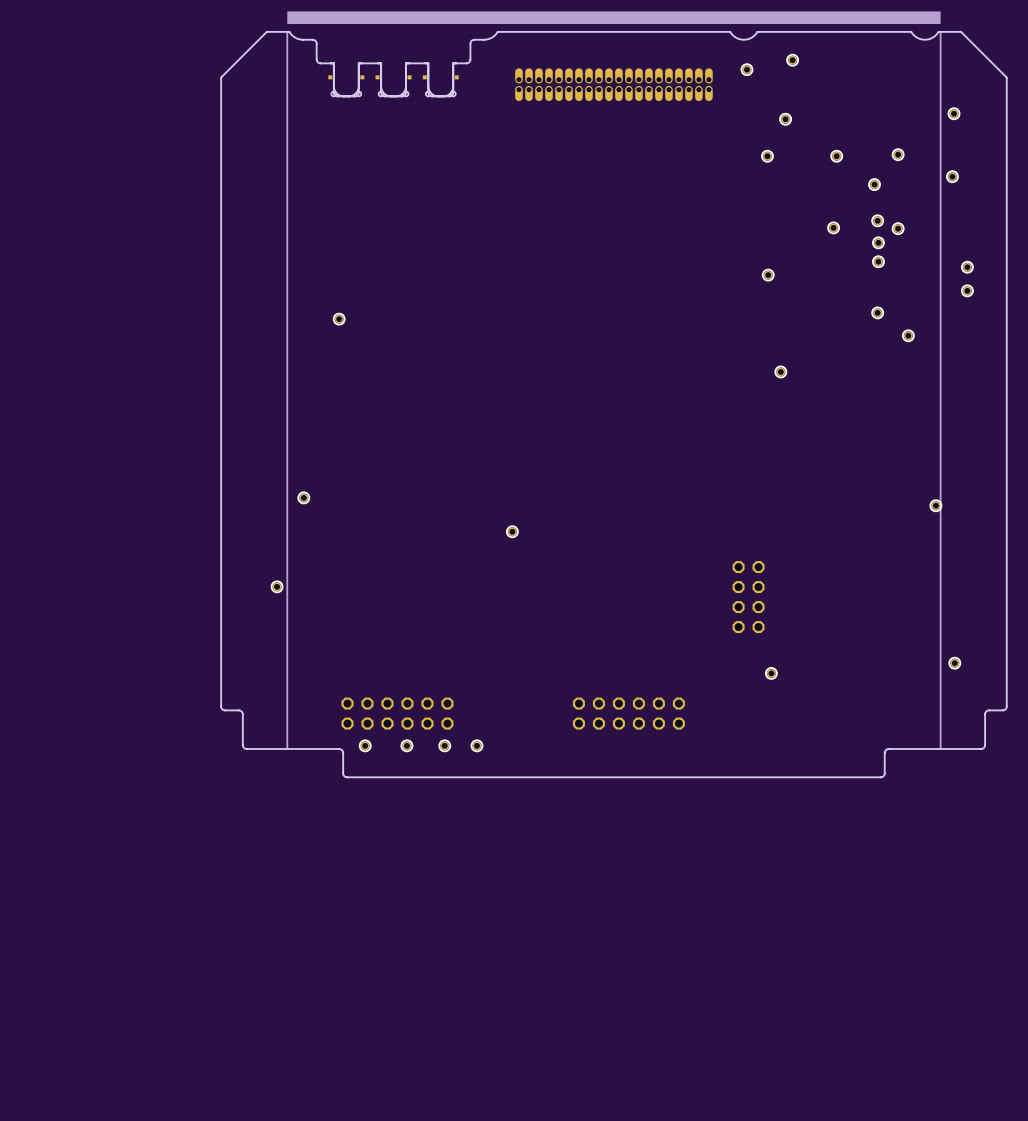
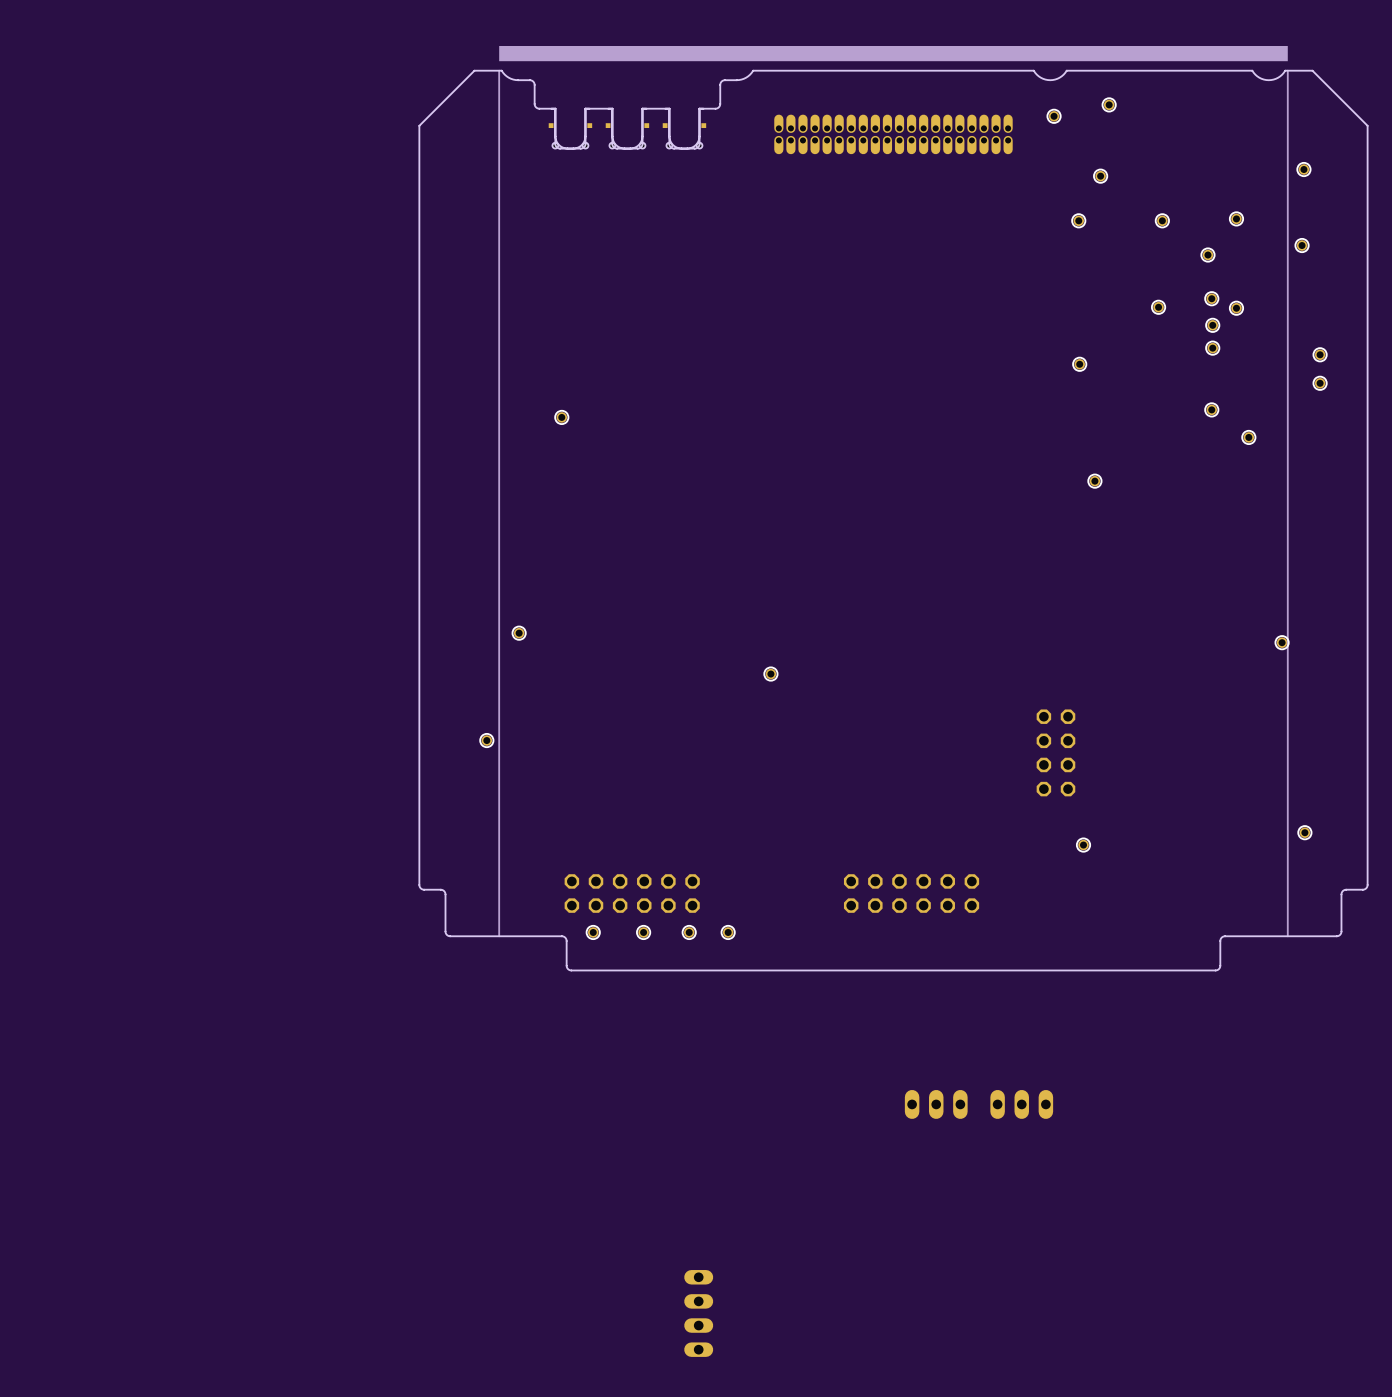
part: none -> (936, 1104)
part: none -> (1021, 1104)
part: none -> (698, 1313)

